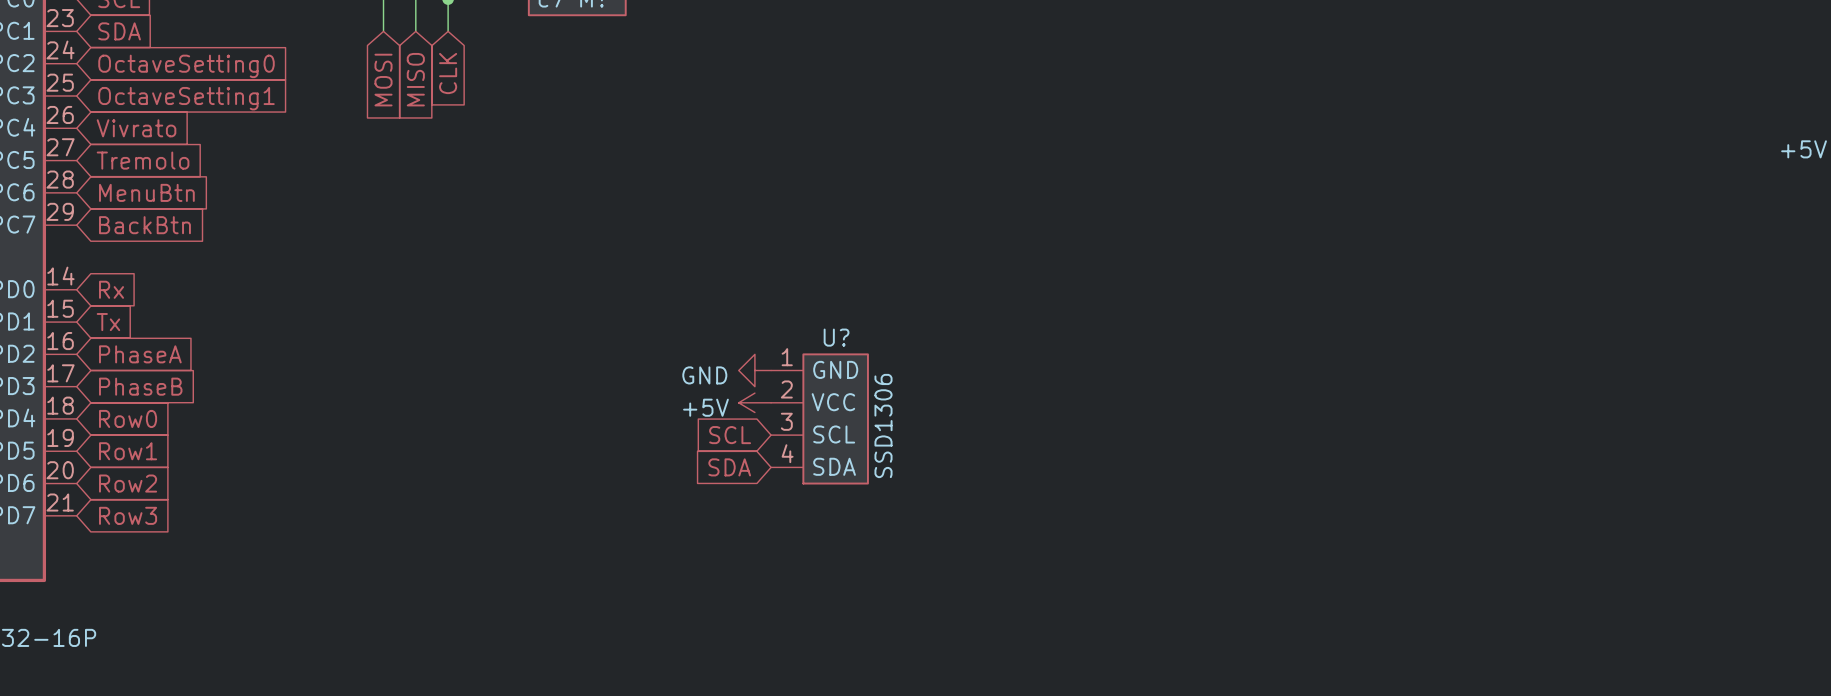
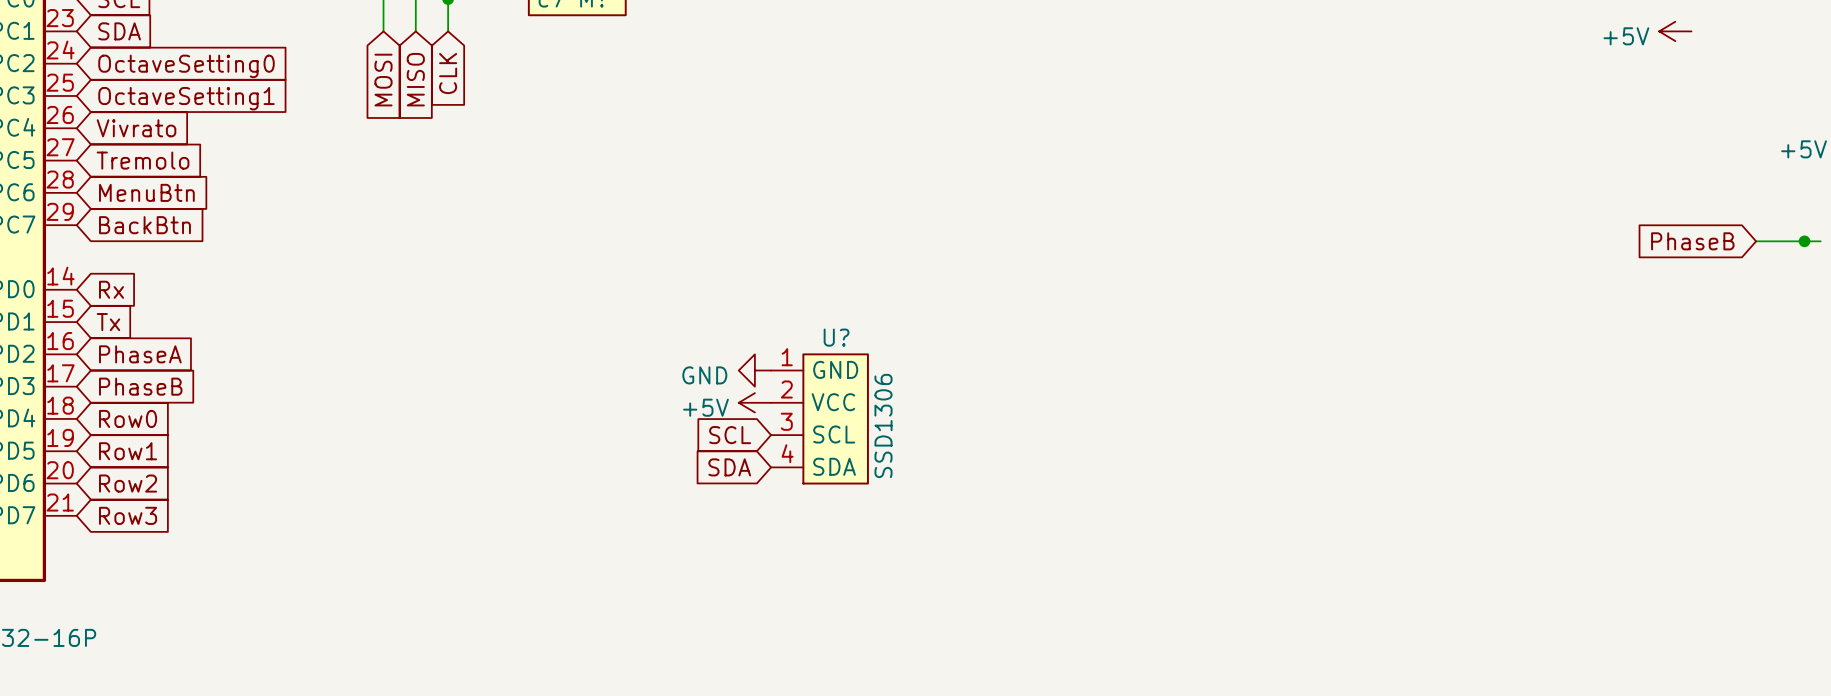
power symbol: none -> +5V (1675, 31)
global label: none -> PhaseB (1692, 241)
wire: none -> (1756, 241) (1820, 241)
junction: none -> (1804, 241)

